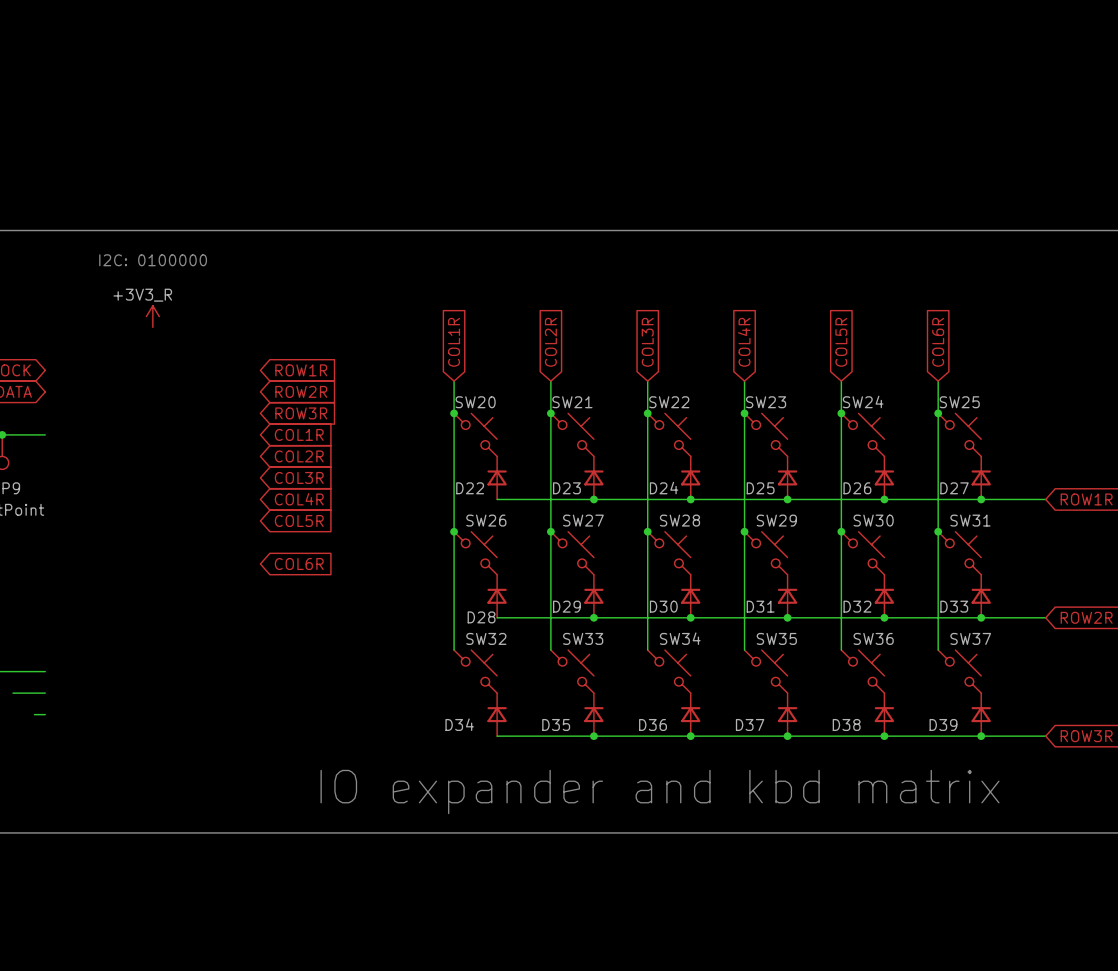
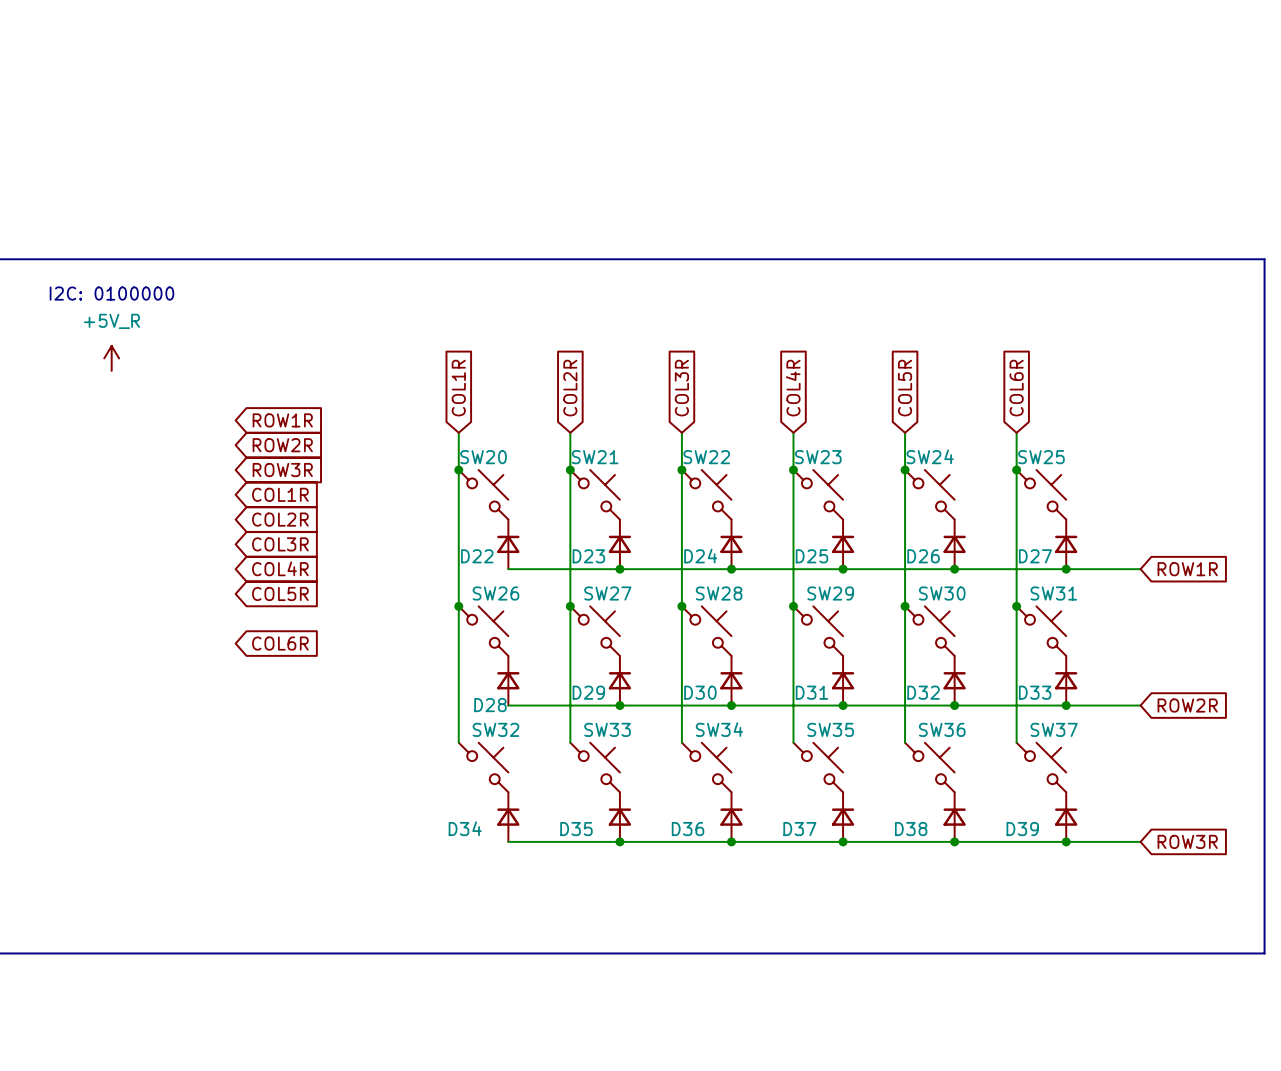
power symbol: +3V3_R (152, 316) -> +5V_R (111, 358)
text: IO expander and kbd matrix (660, 791) -> none

